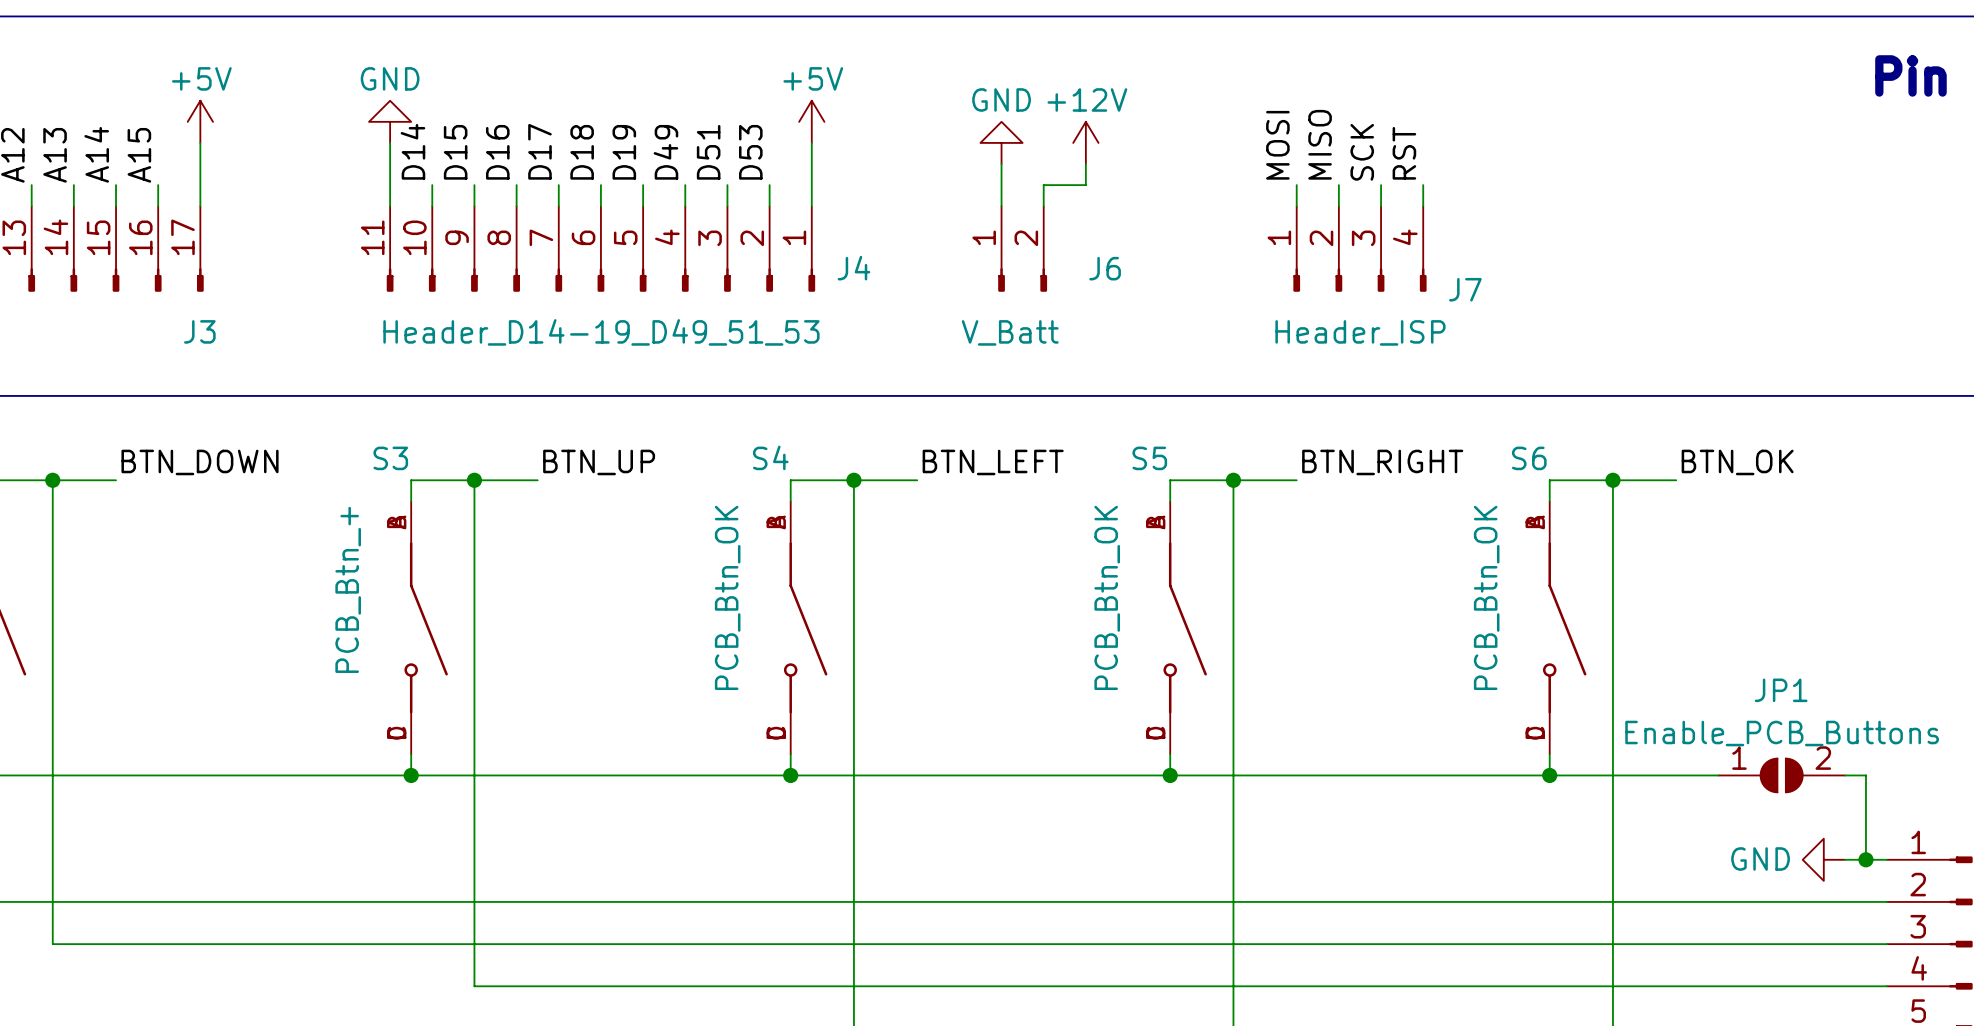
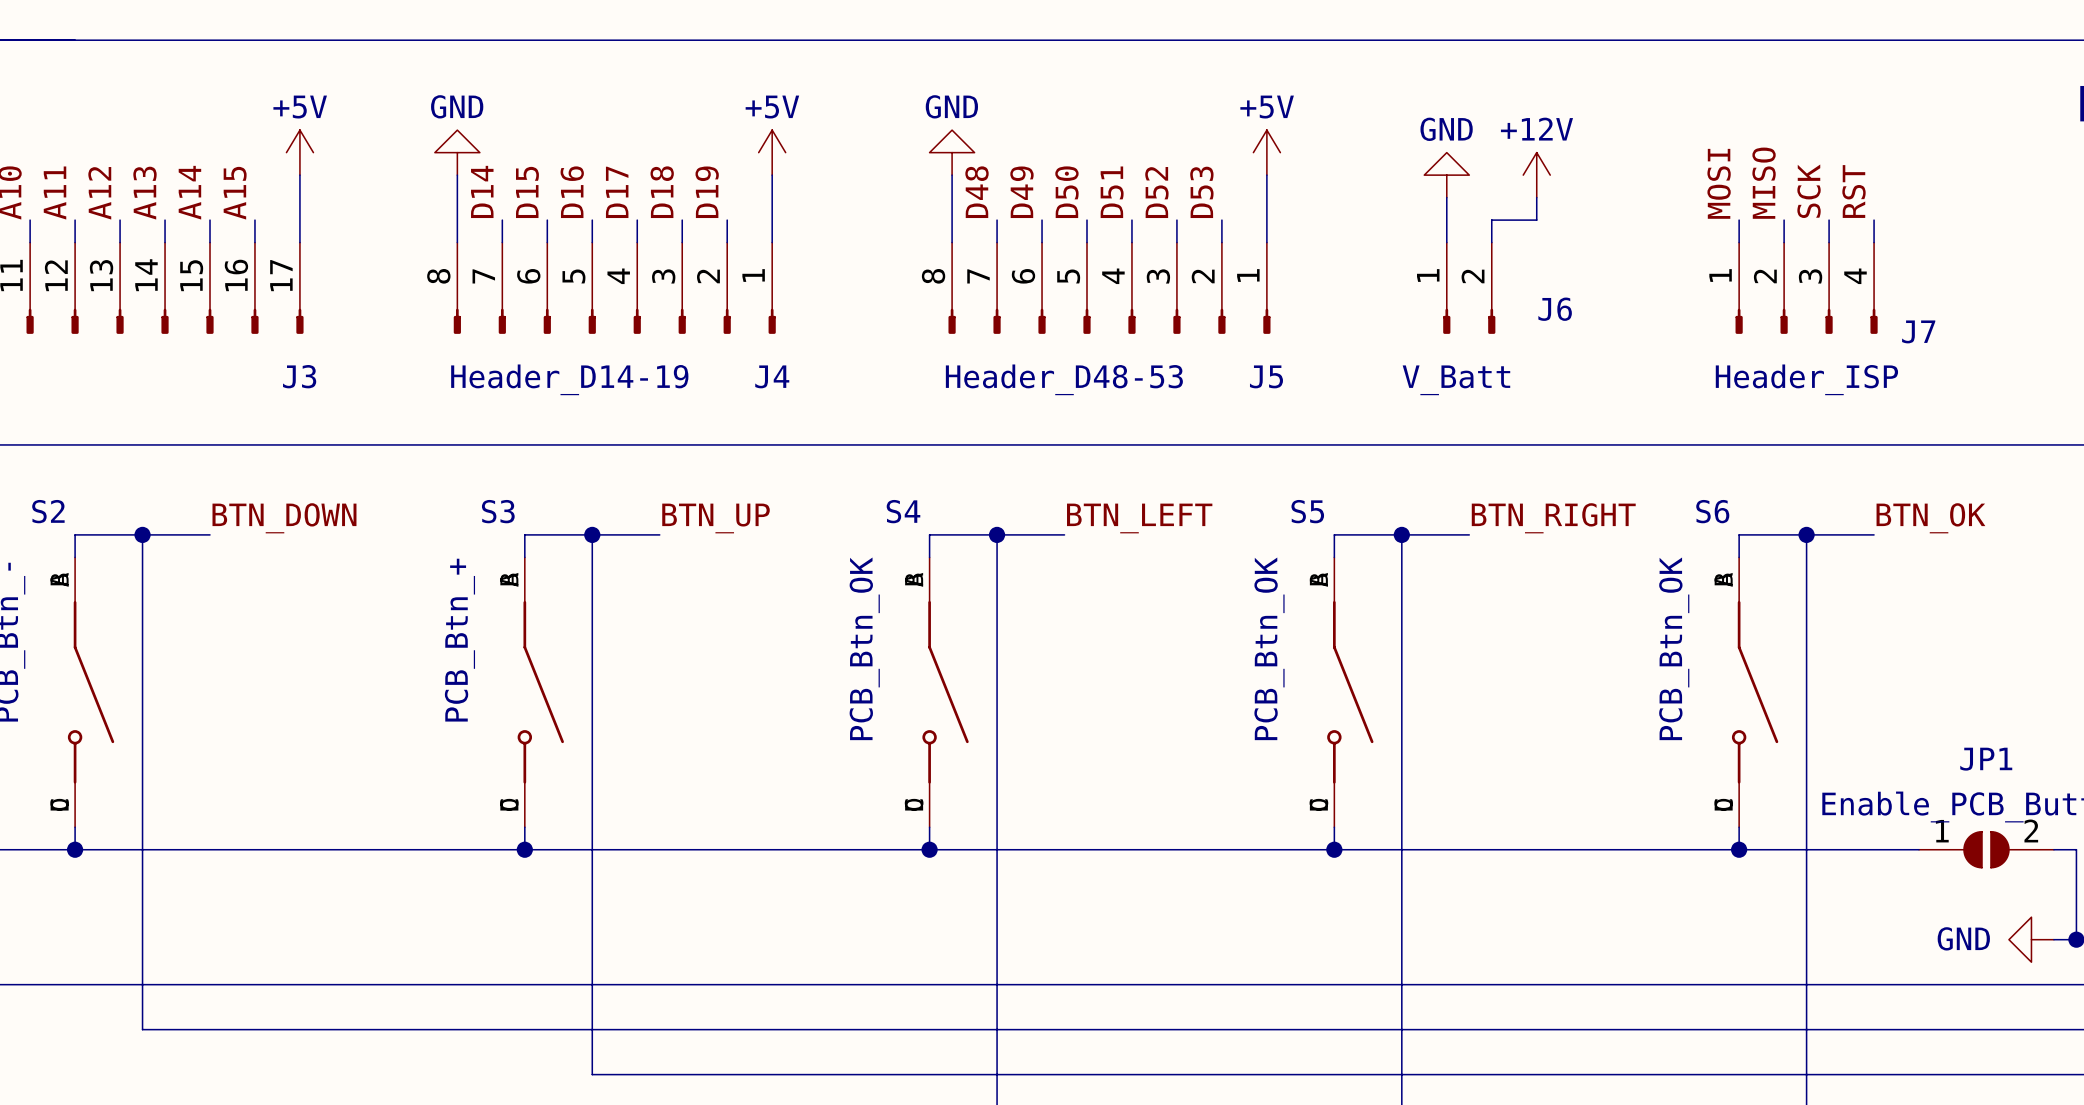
power symbol position: GND (390, 121) -> GND (457, 152)
power symbol: none -> +5V (772, 152)
power symbol: +5V (811, 121) -> GND (952, 152)
power symbol: none -> +5V (1266, 152)
wire: none -> (457, 175) (457, 242)
wire: (390, 142) (390, 185) -> (772, 175) (772, 220)
power symbol position: GND (1001, 142) -> GND (1446, 175)
power symbol position: +12V (1085, 142) -> +12V (1536, 175)
wire: none -> (1266, 175) (1266, 242)
label position: MISO (1320, 144) -> MISO (1764, 183)
label position: MOSI (1277, 145) -> MOSI (1719, 183)
label: none -> D14 (482, 191)
label: D14 (412, 151) -> D15 (527, 192)
label: D17 (539, 151) -> D18 (662, 192)
label: D15 (455, 152) -> D16 (572, 192)
label: D16 (497, 152) -> D17 (617, 192)
label: D18 (582, 152) -> D19 (707, 192)
label: D19 (624, 152) -> none
label position: D49 (665, 152) -> D49 (1021, 192)
label position: D51 (708, 152) -> D51 (1112, 192)
label position: D53 (750, 152) -> D53 (1201, 192)
label: none -> D48 (977, 192)
label: none -> D50 (1066, 192)
label: none -> D52 (1156, 192)
label position: SCK (1362, 152) -> SCK (1809, 191)
label position: RST (1404, 153) -> RST (1853, 191)
wire: (1001, 164) (1001, 206) -> (1446, 197) (1446, 242)
wire: (1085, 164) (1085, 185) (1043, 185) (1043, 206) -> (1536, 197) (1536, 220) (1491, 220) (1491, 242)
wire: (685, 185) (685, 206) -> (1087, 220) (1087, 242)
wire: (727, 185) (727, 206) -> (1131, 220) (1131, 242)
wire: (769, 185) (769, 206) -> (1176, 220) (1176, 242)
wire: none -> (997, 220) (997, 242)
wire: none -> (1042, 220) (1042, 242)
wire: none -> (1221, 220) (1221, 242)
wire: (1296, 185) (1296, 206) -> (1739, 220) (1739, 242)
wire: (1338, 185) (1338, 206) -> (1784, 220) (1784, 242)
wire: (1381, 185) (1381, 206) -> (1829, 220) (1829, 242)
wire: (1423, 185) (1423, 206) -> (1874, 220) (1874, 242)
J4 symbol: [386, 206, 816, 292] -> [453, 242, 776, 334]
J5: none -> Header_D48-53 (1109, 288)
J6 position: (1022, 248) -> (1469, 288)
J7 position: (1359, 248) -> (1806, 288)
J4 name position: J4 (853, 268) -> J4 (772, 376)
J4 value: Header_D14-19_D49_51_53 (601, 332) -> Header_D14-19 (569, 379)

